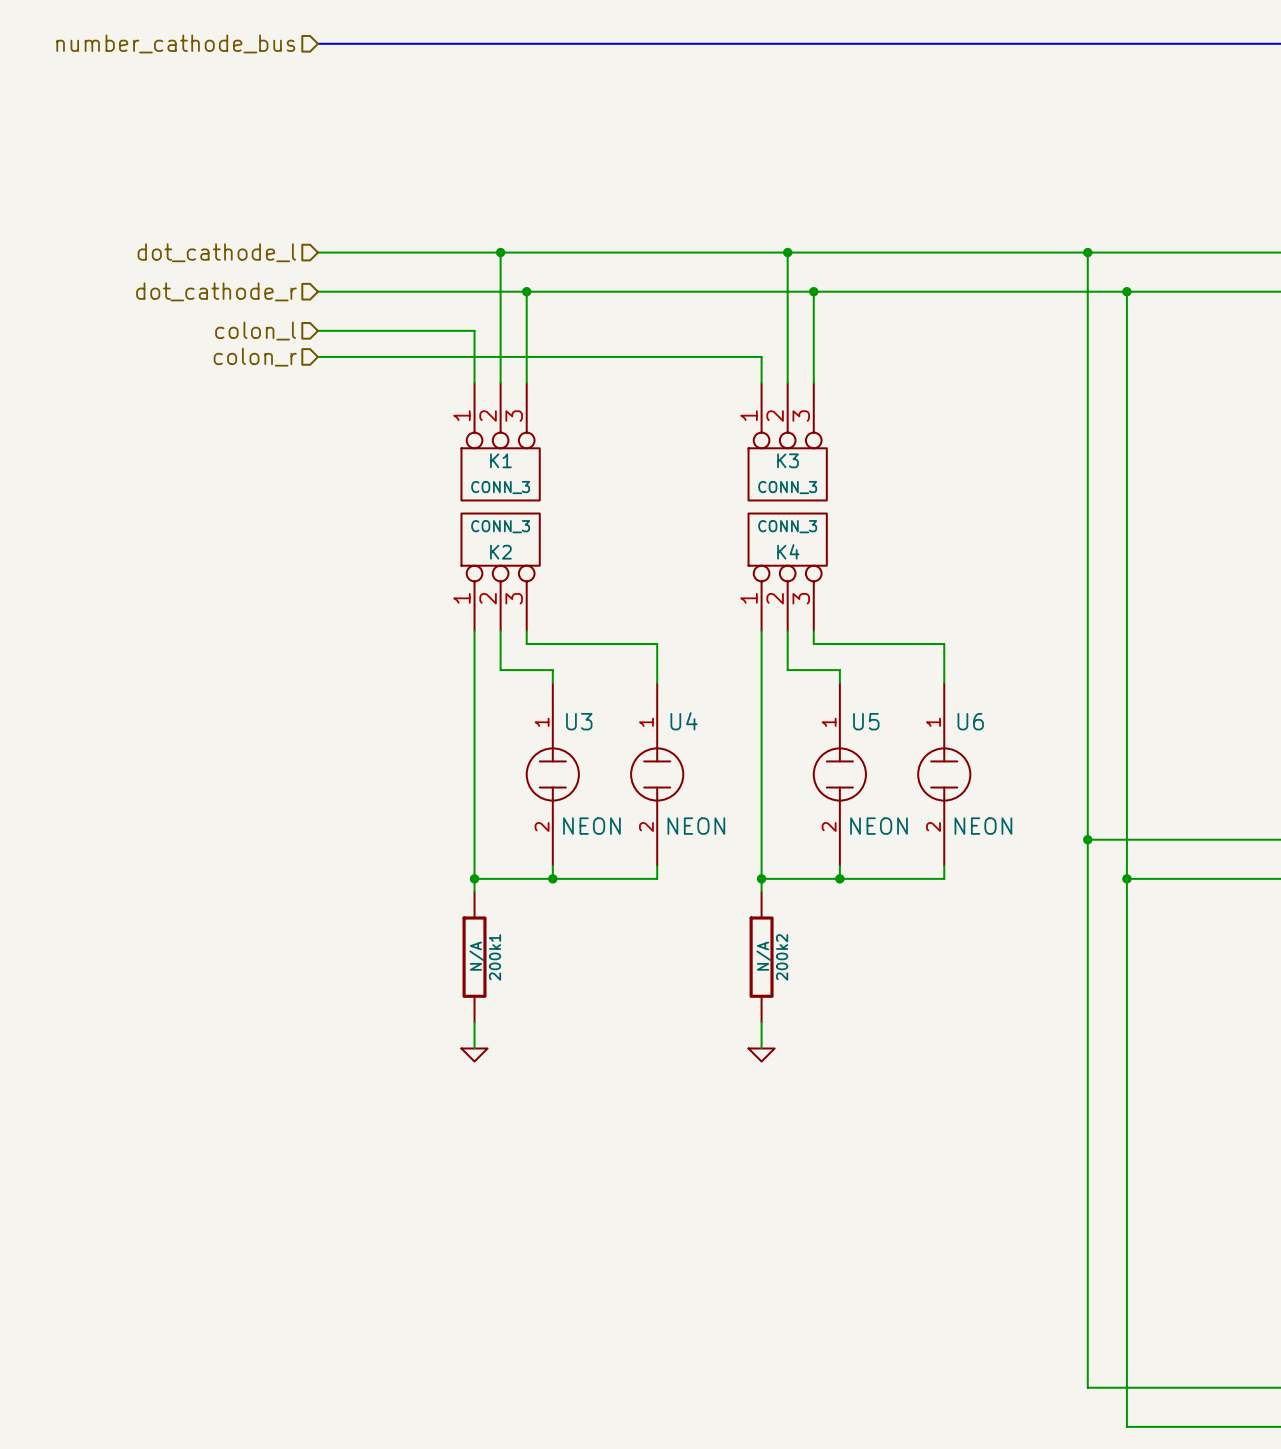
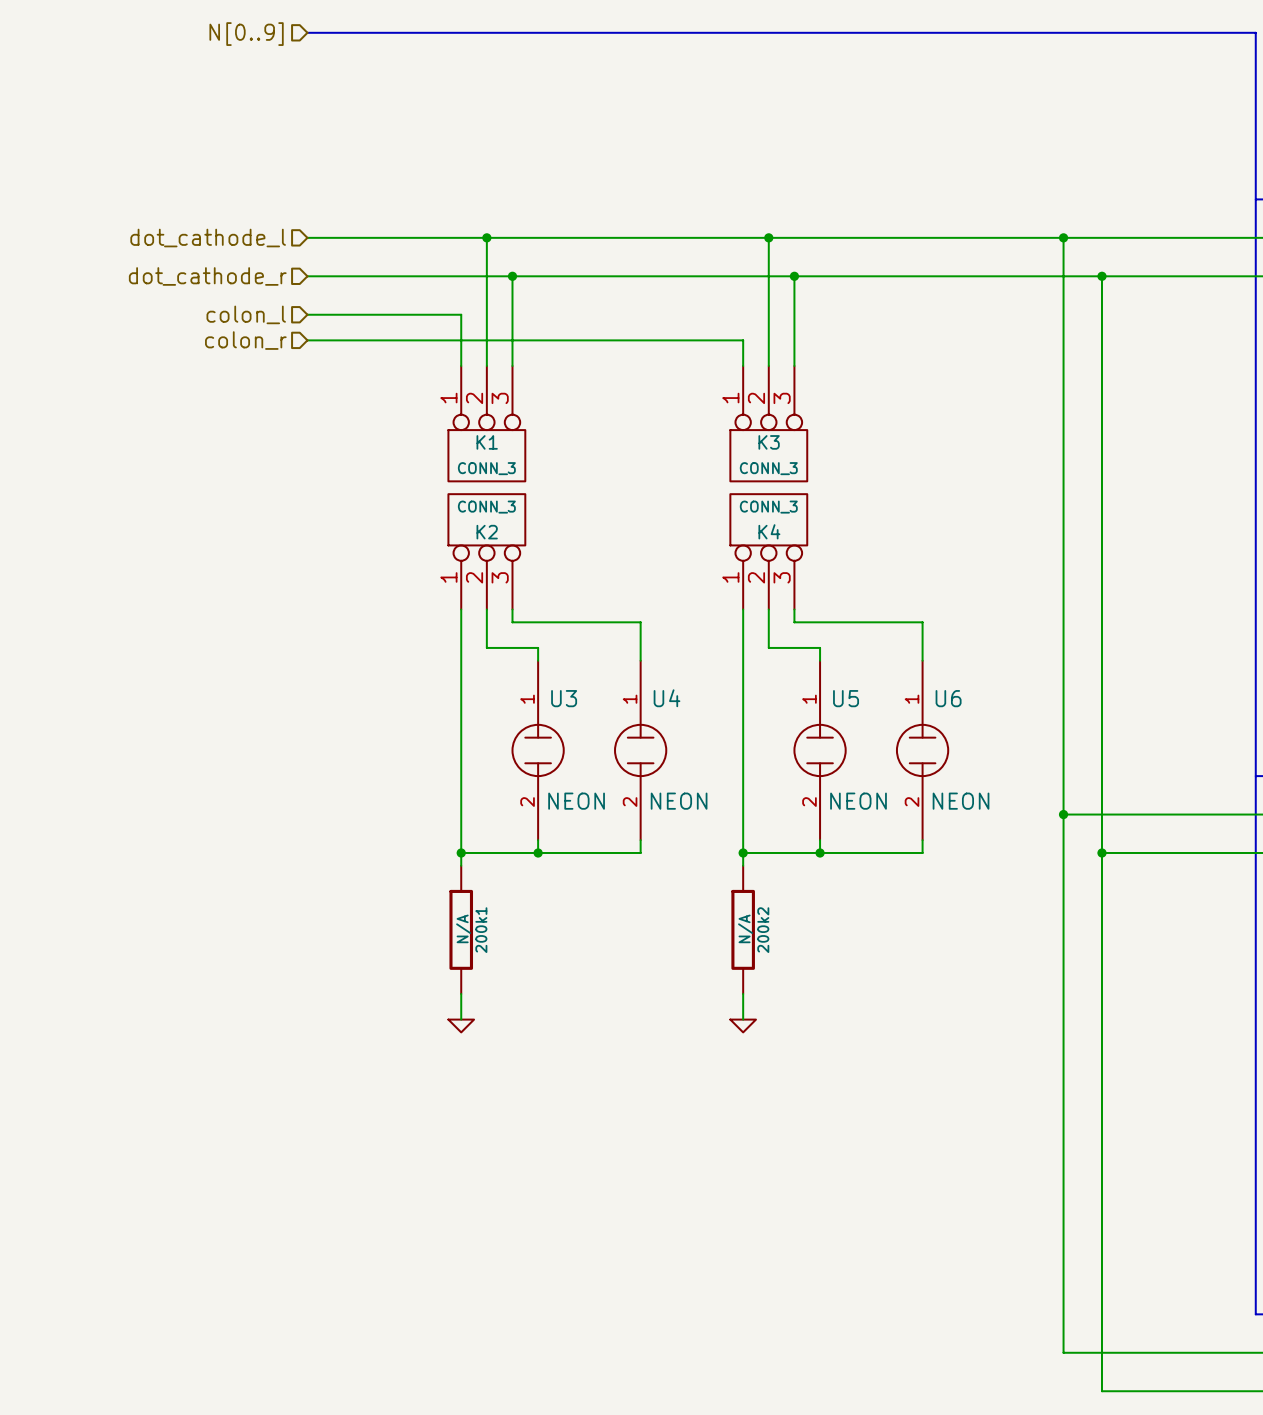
hierarchical label: number_cathode_bus (175, 43) -> N[0..9] (246, 34)

